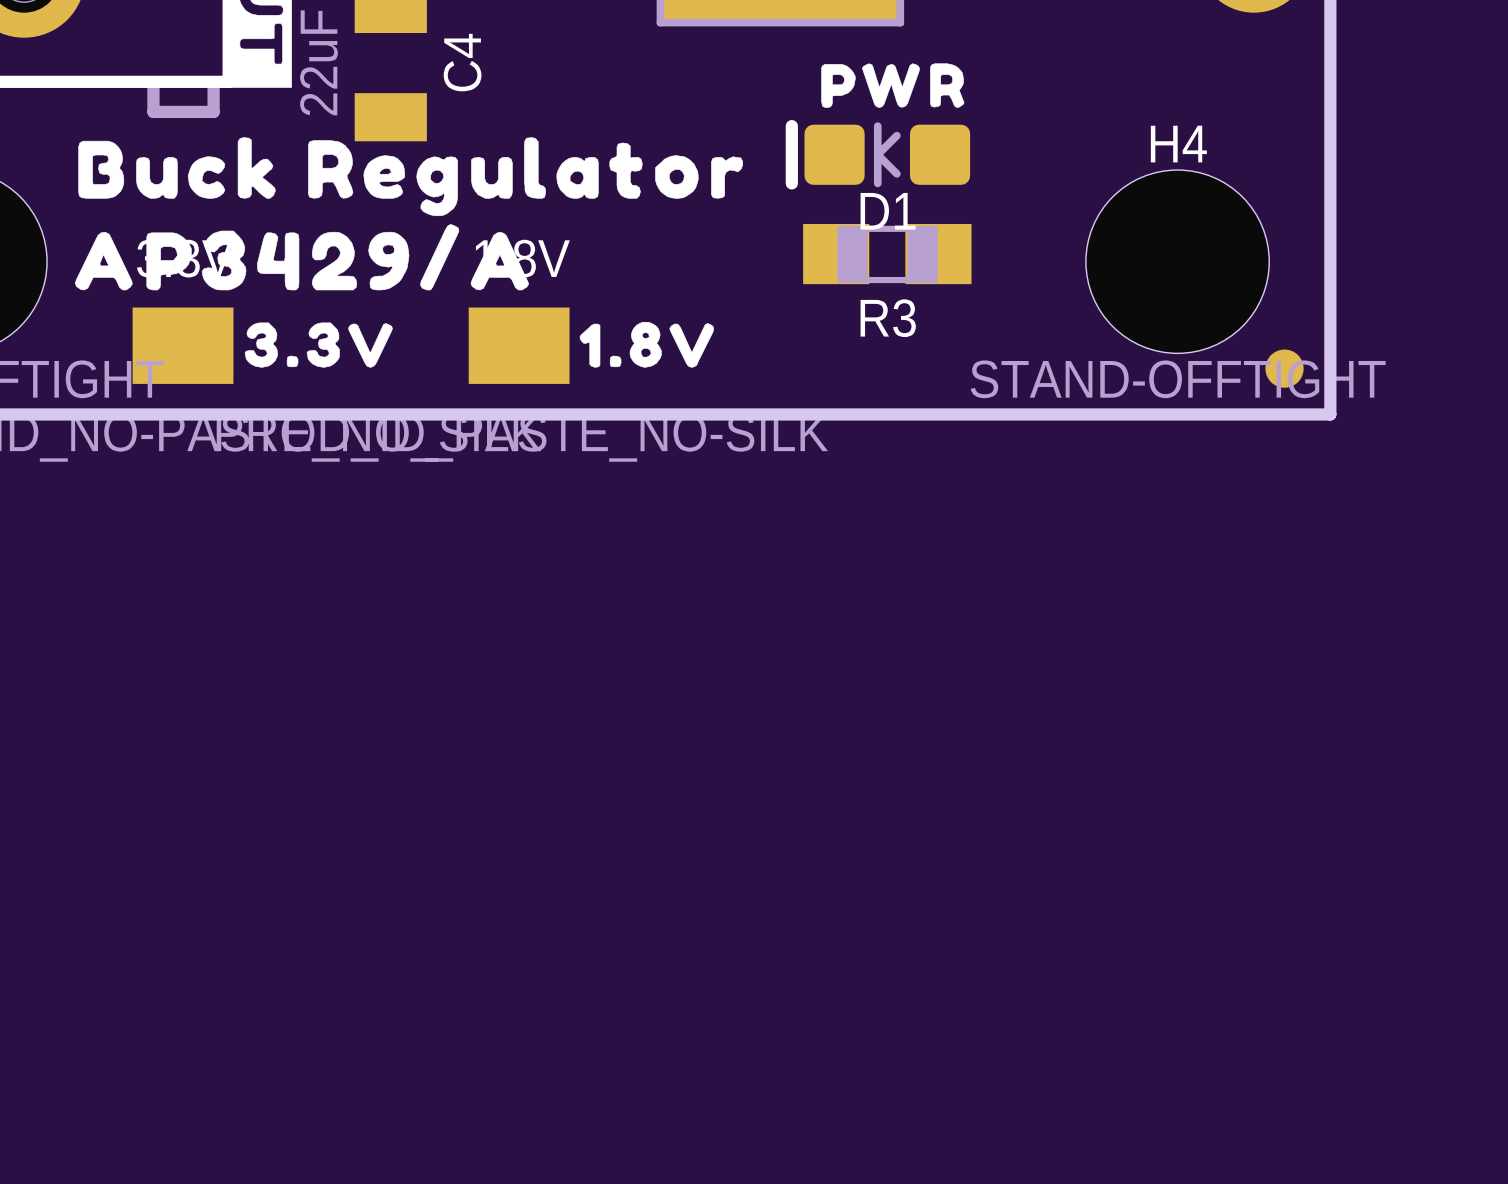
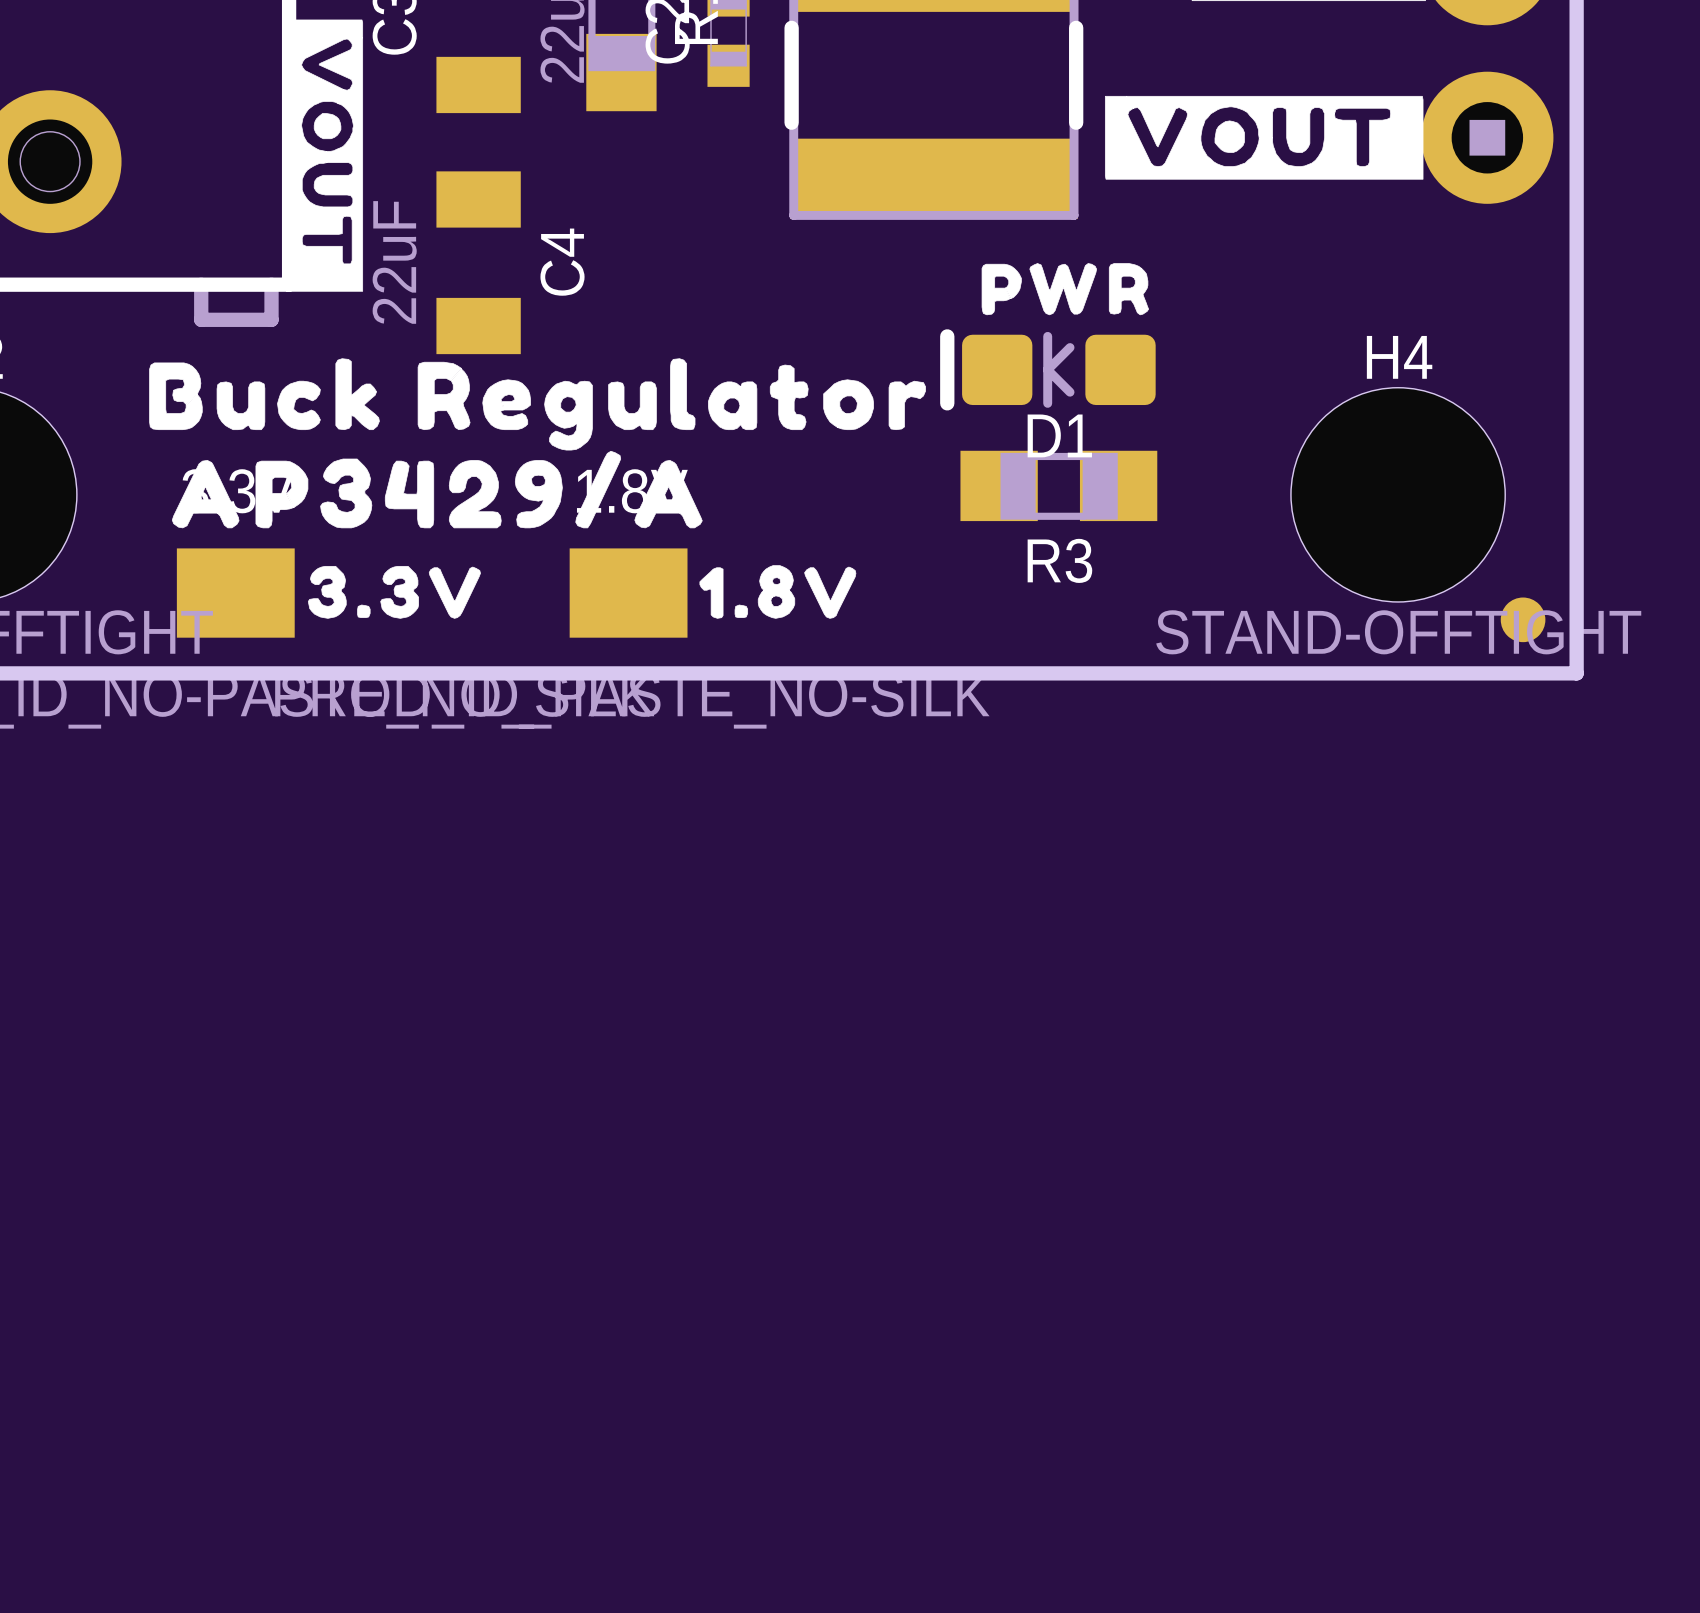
drawing position: (410, 176) -> (537, 404)
drawing position: (301, 257) -> (437, 489)

